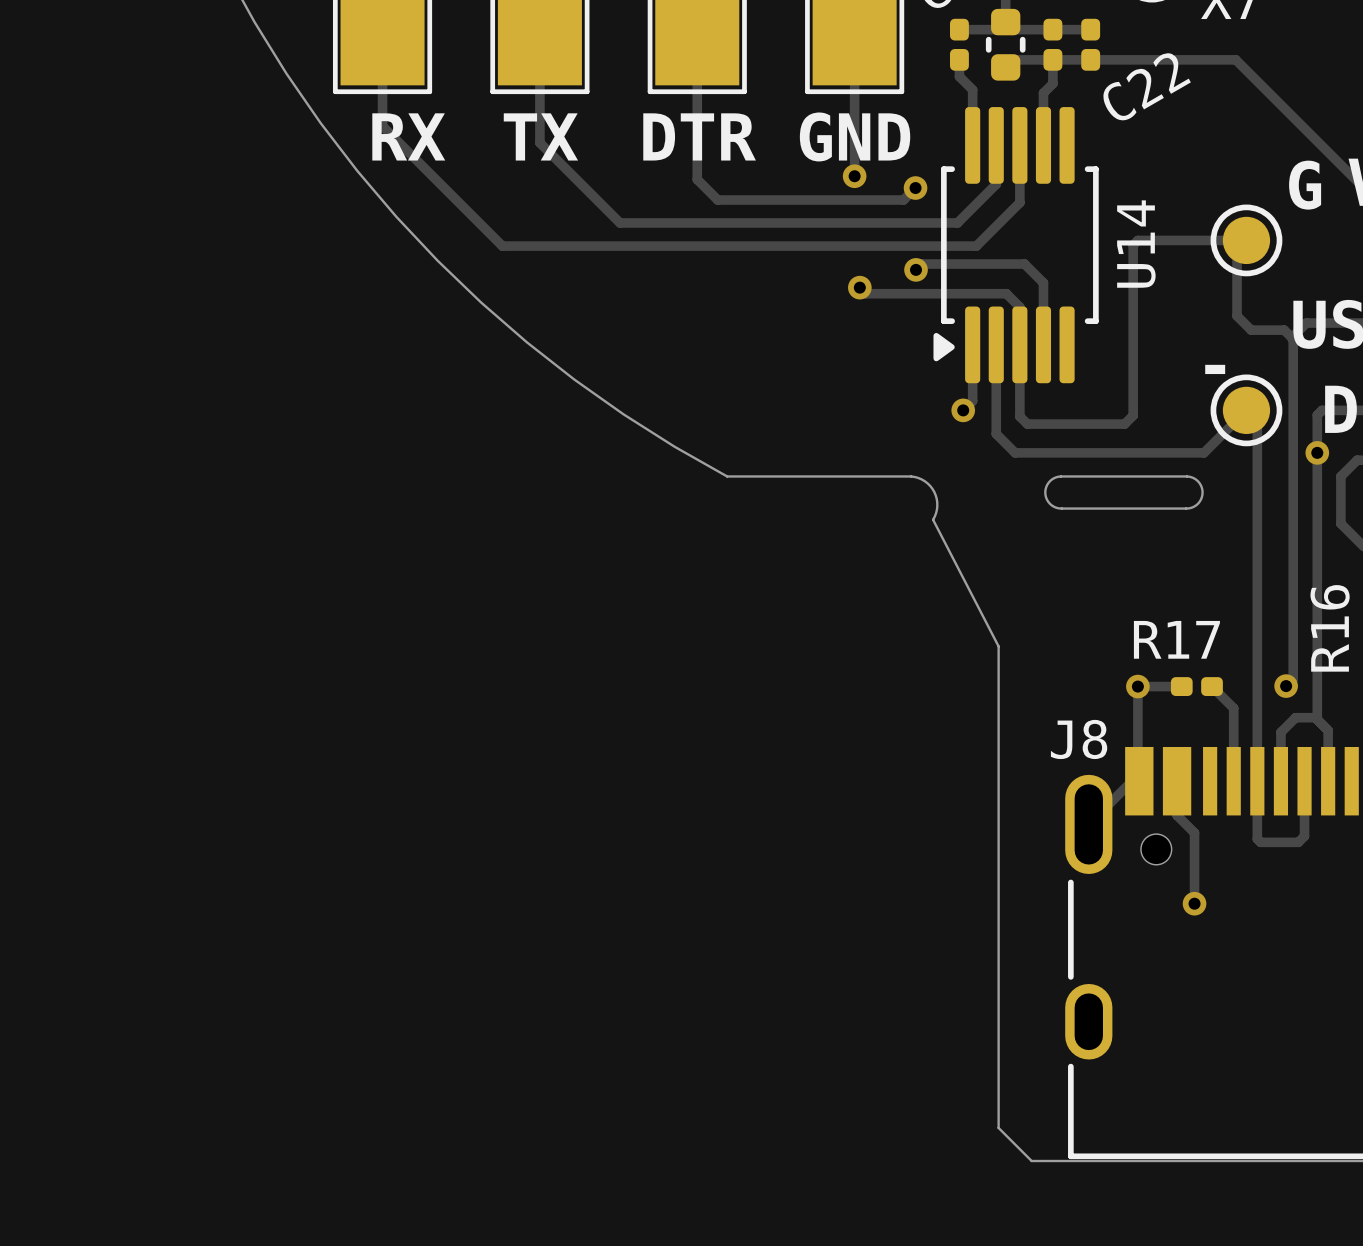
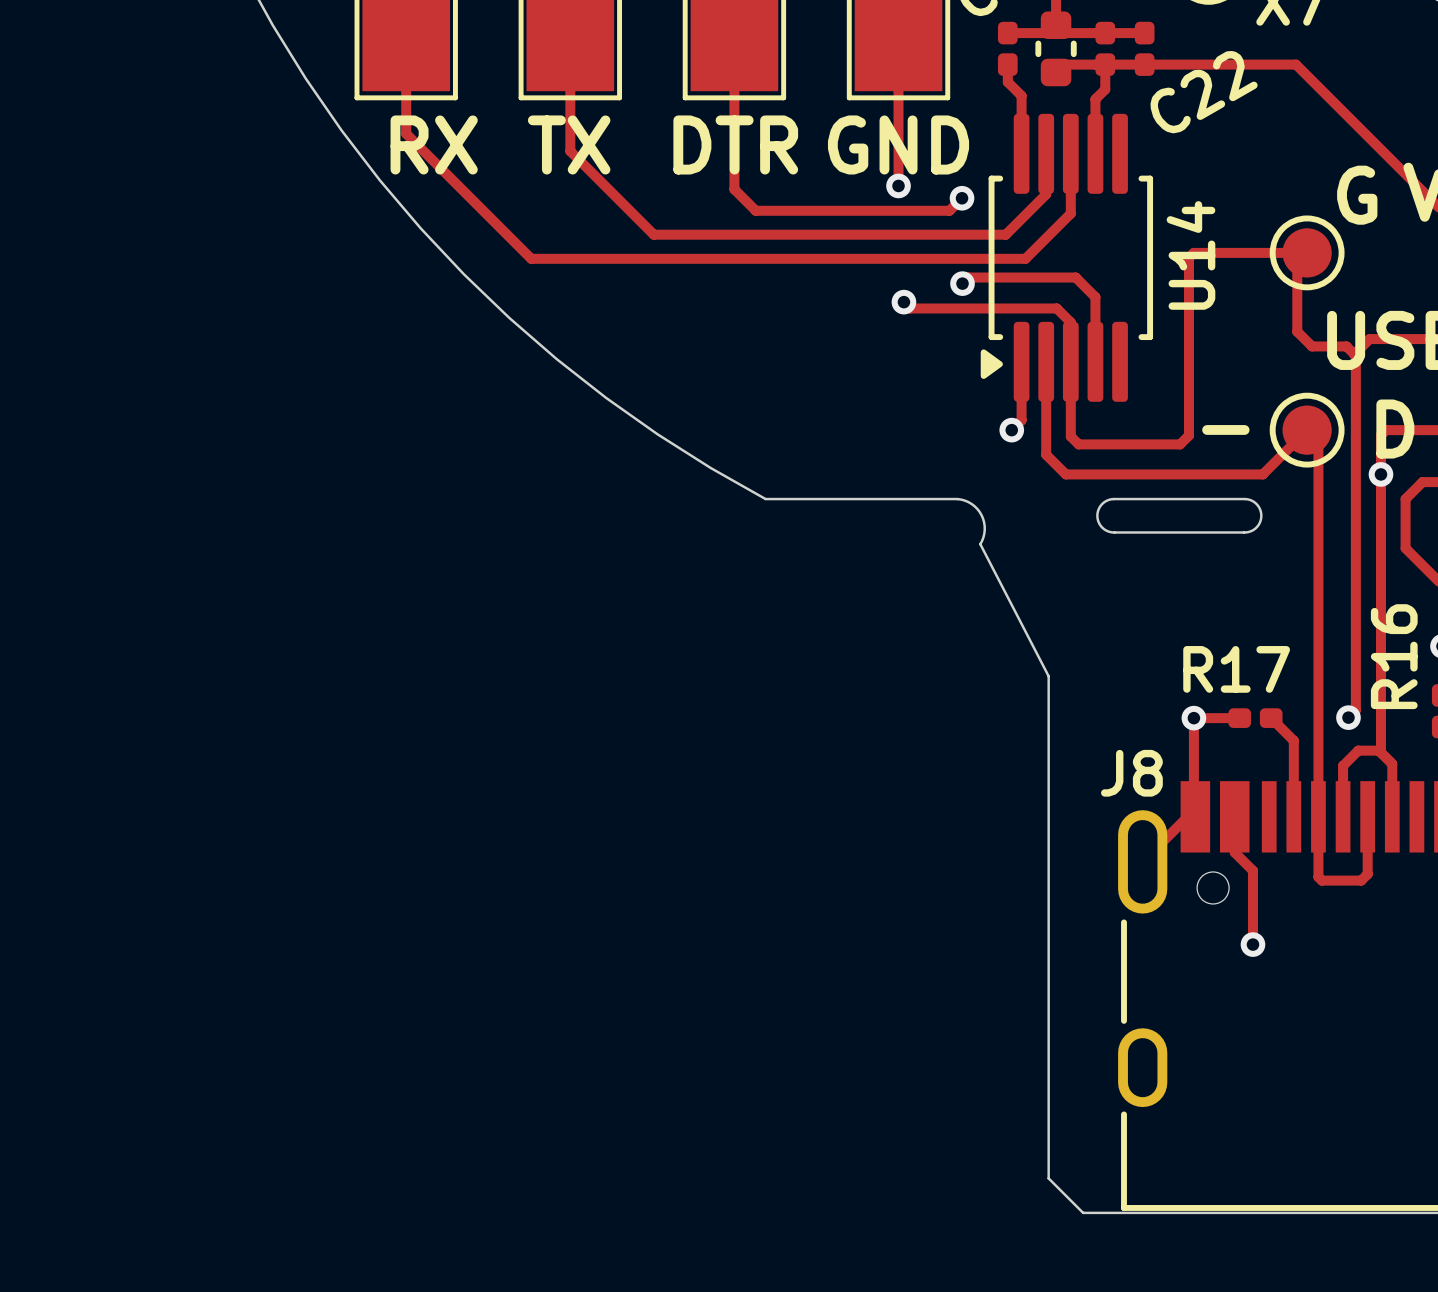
text position: - (1215, 369) -> - (1225, 429)

